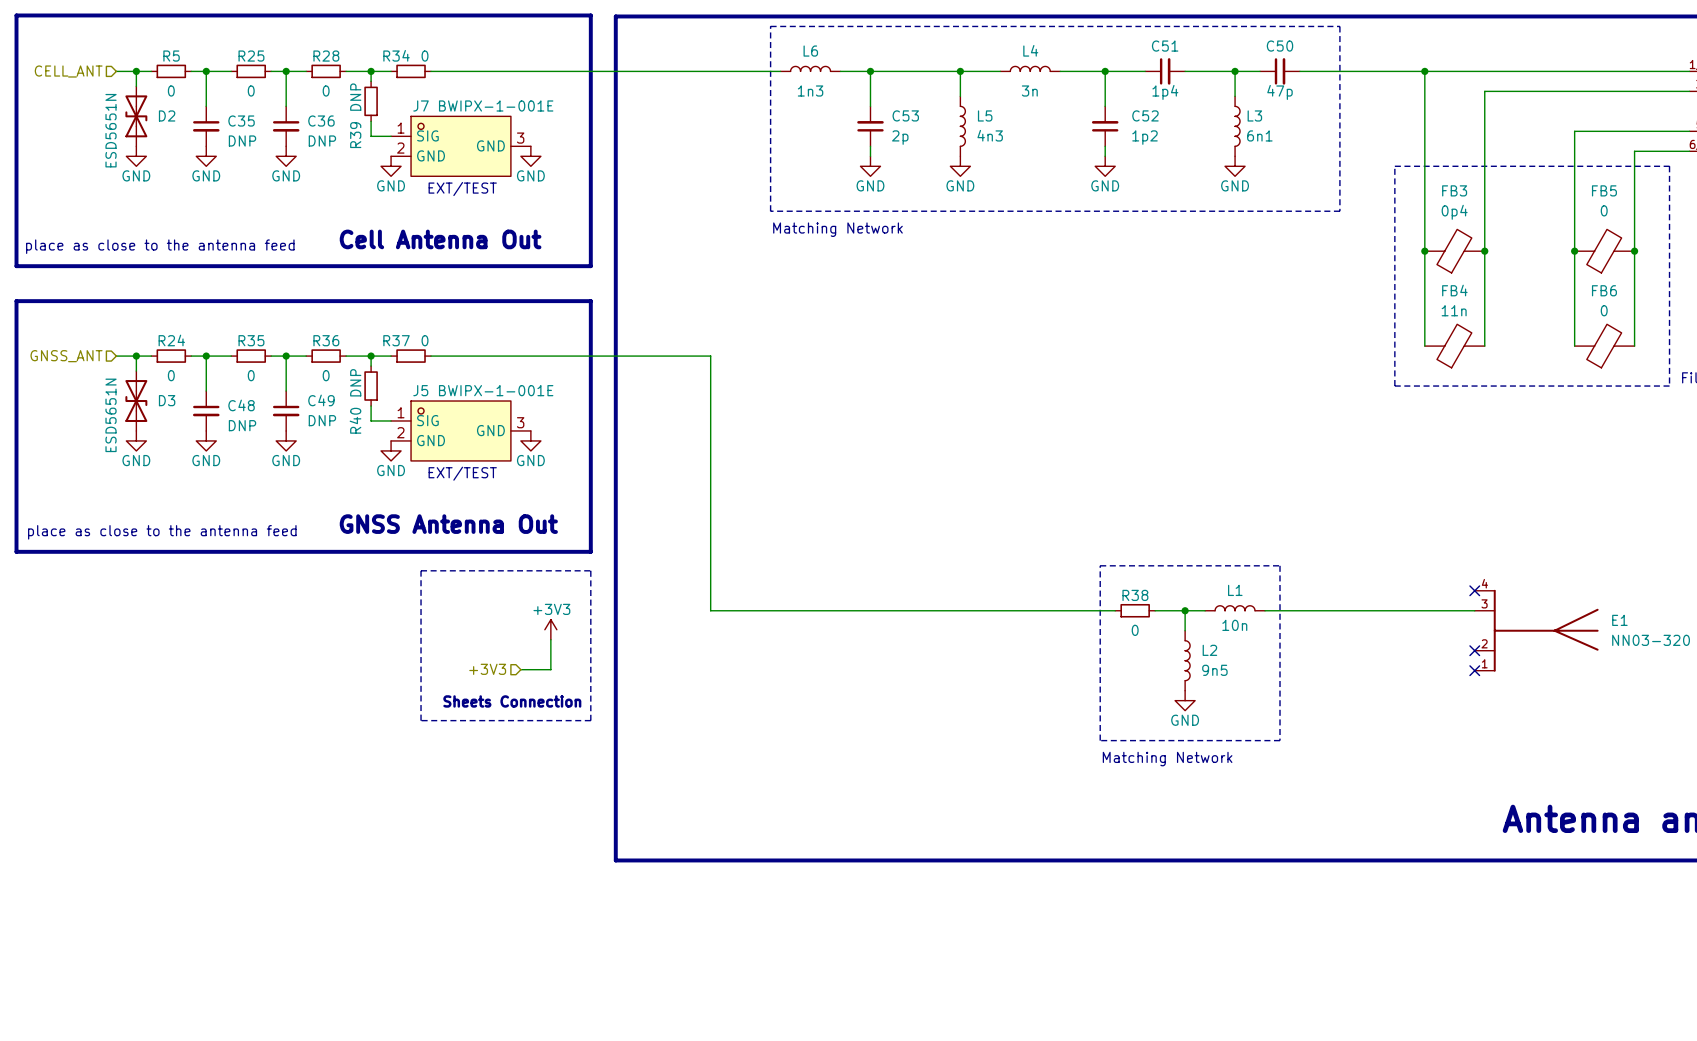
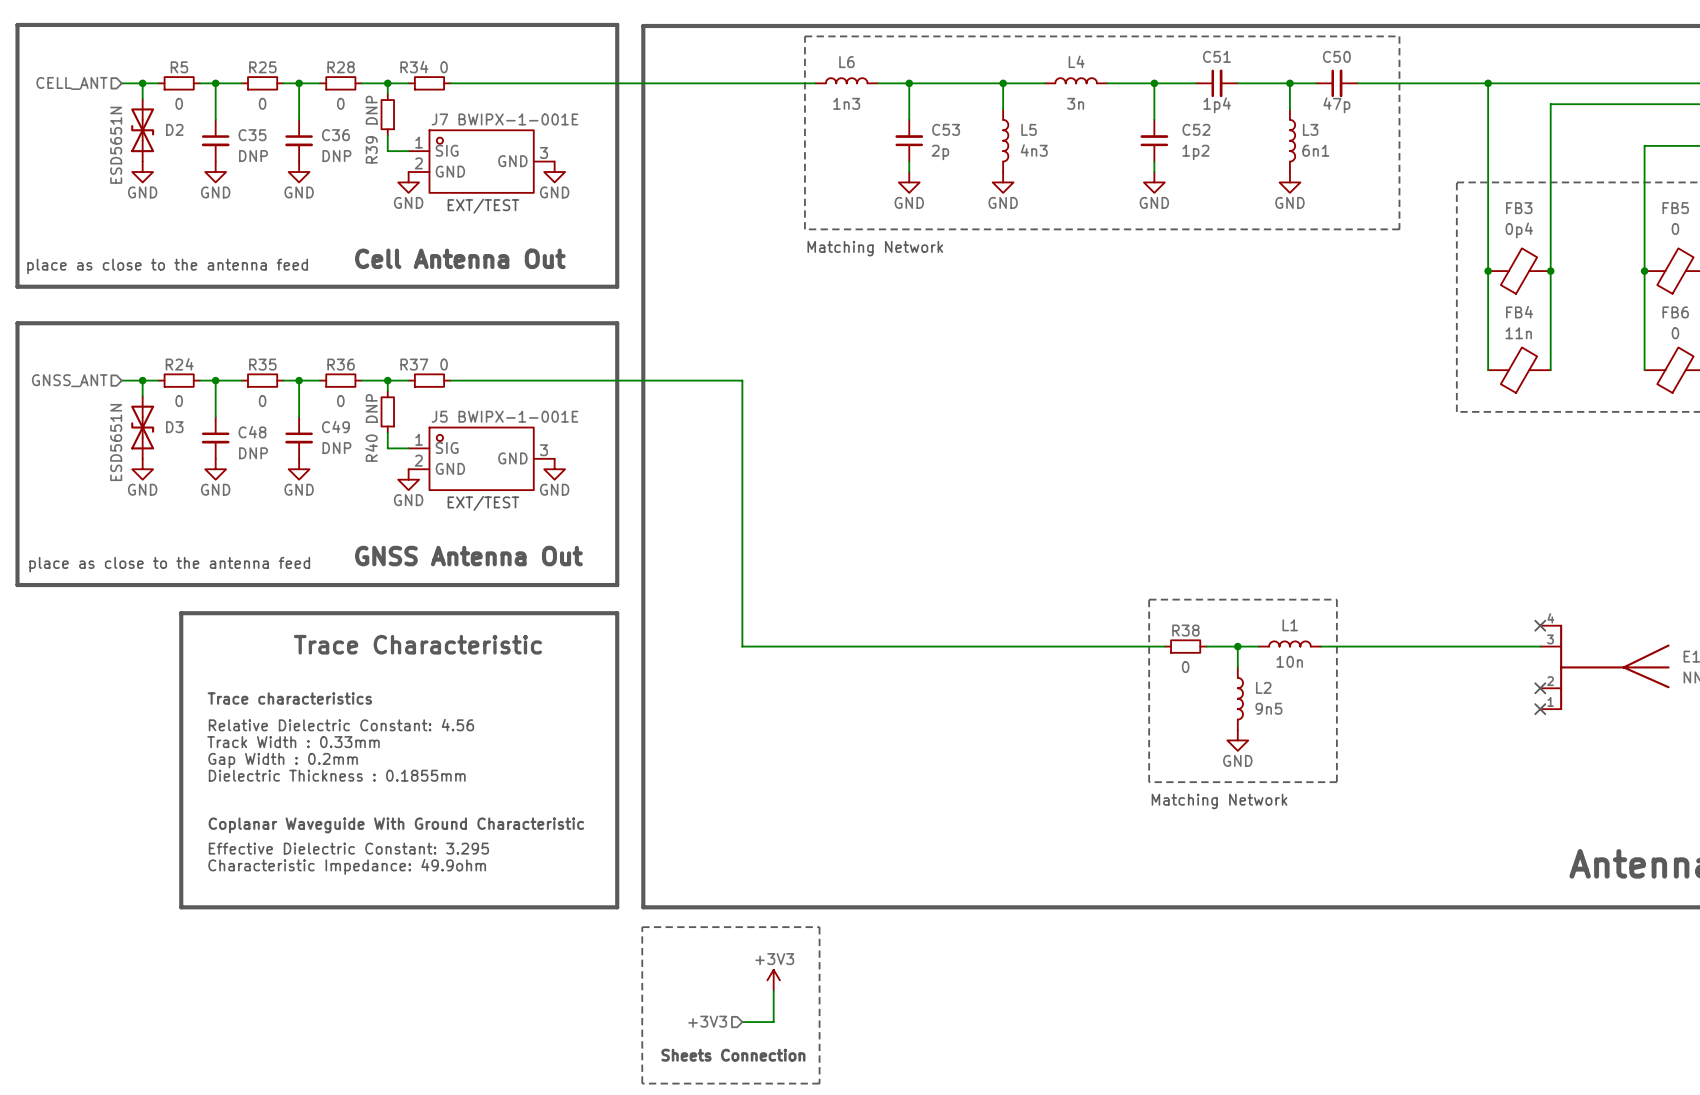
line: (421, 570) (590, 570) (590, 720) (421, 720) (421, 570) -> none
line: none -> (181, 613) (617, 613) (617, 907) (181, 907) (181, 613)
text: none -> Trace Characteristic (417, 644)
power symbol: +3V3 (550, 629) -> none
wire: (550, 639) (550, 669) (520, 669) -> none
text: none -> Trace characteristics (289, 698)
hierarchical label: +3V3 (487, 669) -> none
text: none -> Relative Dielectric Constant: 4.56 (341, 725)
text: Sheets Connection (512, 701) -> none
text: none -> Track Width : 0.33mm (293, 742)
text: none -> Gap Width : 0.2mm (283, 760)
text: none -> Dielectric Thickness : 0.1855mm (337, 775)
text: none -> Coplanar Waveguide With Ground Characteristic (396, 825)
text: none -> Effective Dielectric Constant: 3.295 (348, 848)
text: none -> Characteristic Impedance: 49.9ohm (347, 866)
line: none -> (642, 927) (819, 927) (819, 1083) (642, 1083) (642, 927)
power symbol: none -> +3V3 (773, 980)
wire: none -> (773, 990) (773, 1022) (742, 1022)
hierarchical label: none -> +3V3 (707, 1021)
text: none -> Sheets Connection (733, 1055)

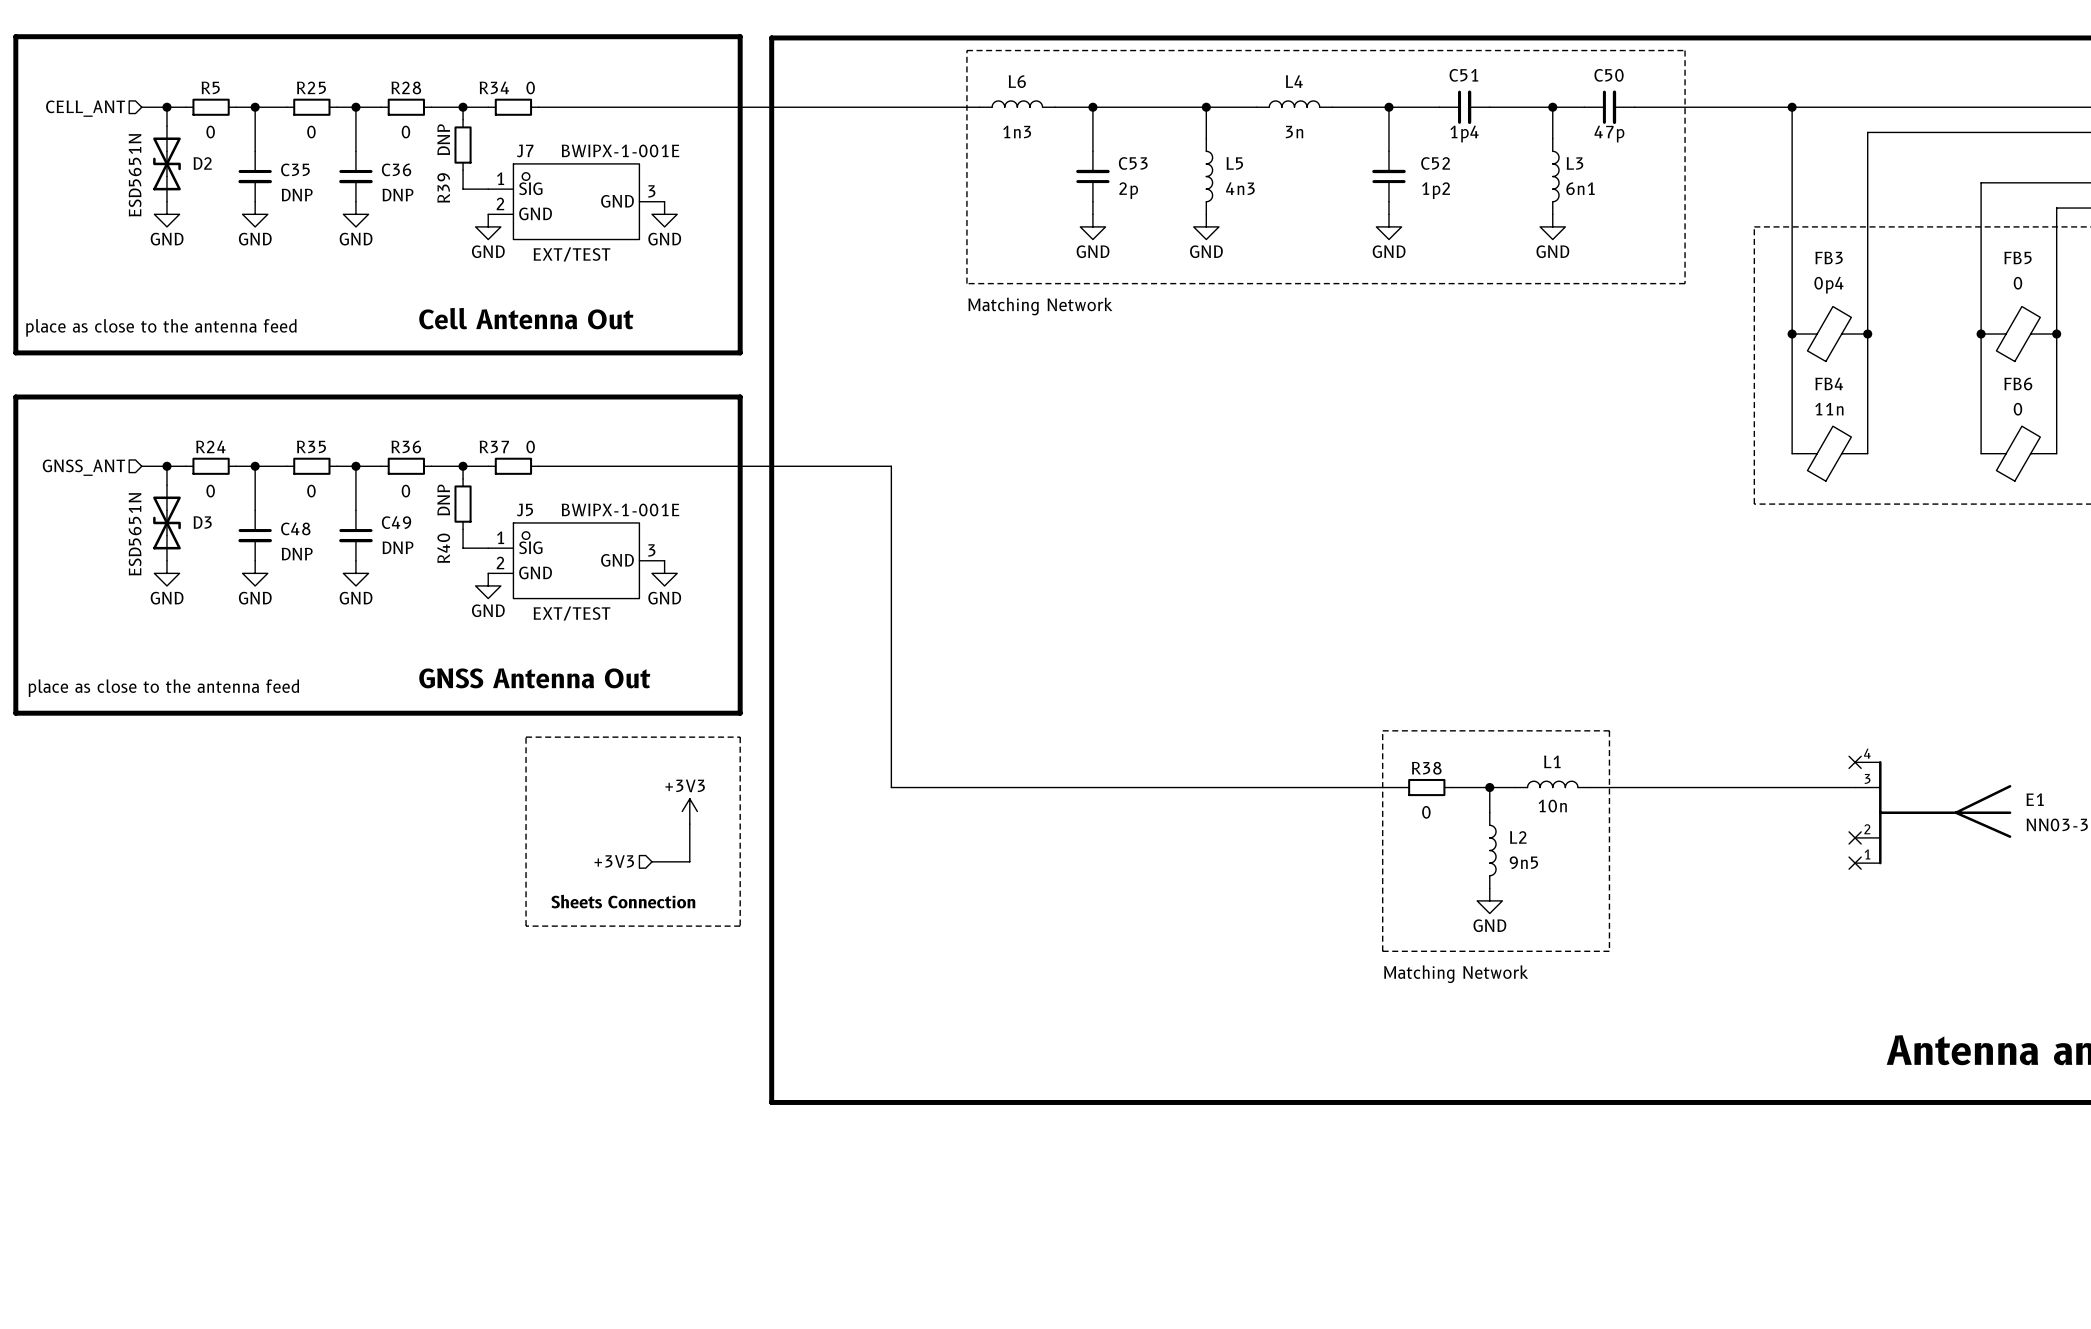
line: none -> (526, 737) (740, 737) (740, 926) (526, 926) (526, 737)
line: (181, 613) (617, 613) (617, 907) (181, 907) (181, 613) -> none
text: Trace Characteristic (417, 644) -> none
power symbol: none -> +3V3 (689, 811)
wire: none -> (689, 824) (689, 861) (652, 861)
text: Trace characteristics (289, 698) -> none
hierarchical label: none -> +3V3 (614, 861)
text: Relative Dielectric Constant: 4.56 (341, 725) -> none
text: none -> Sheets Connection (623, 901)
text: Track Width : 0.33mm (293, 742) -> none
text: Gap Width : 0.2mm (283, 760) -> none
text: Dielectric Thickness : 0.1855mm (337, 775) -> none
text: Coplanar Waveguide With Ground Characteristic (396, 825) -> none
text: Effective Dielectric Constant: 3.295 (348, 848) -> none
text: Characteristic Impedance: 49.9ohm (347, 866) -> none
line: (642, 927) (819, 927) (819, 1083) (642, 1083) (642, 927) -> none
power symbol: +3V3 (773, 980) -> none
wire: (773, 990) (773, 1022) (742, 1022) -> none
hierarchical label: +3V3 (707, 1021) -> none
text: Sheets Connection (733, 1055) -> none

